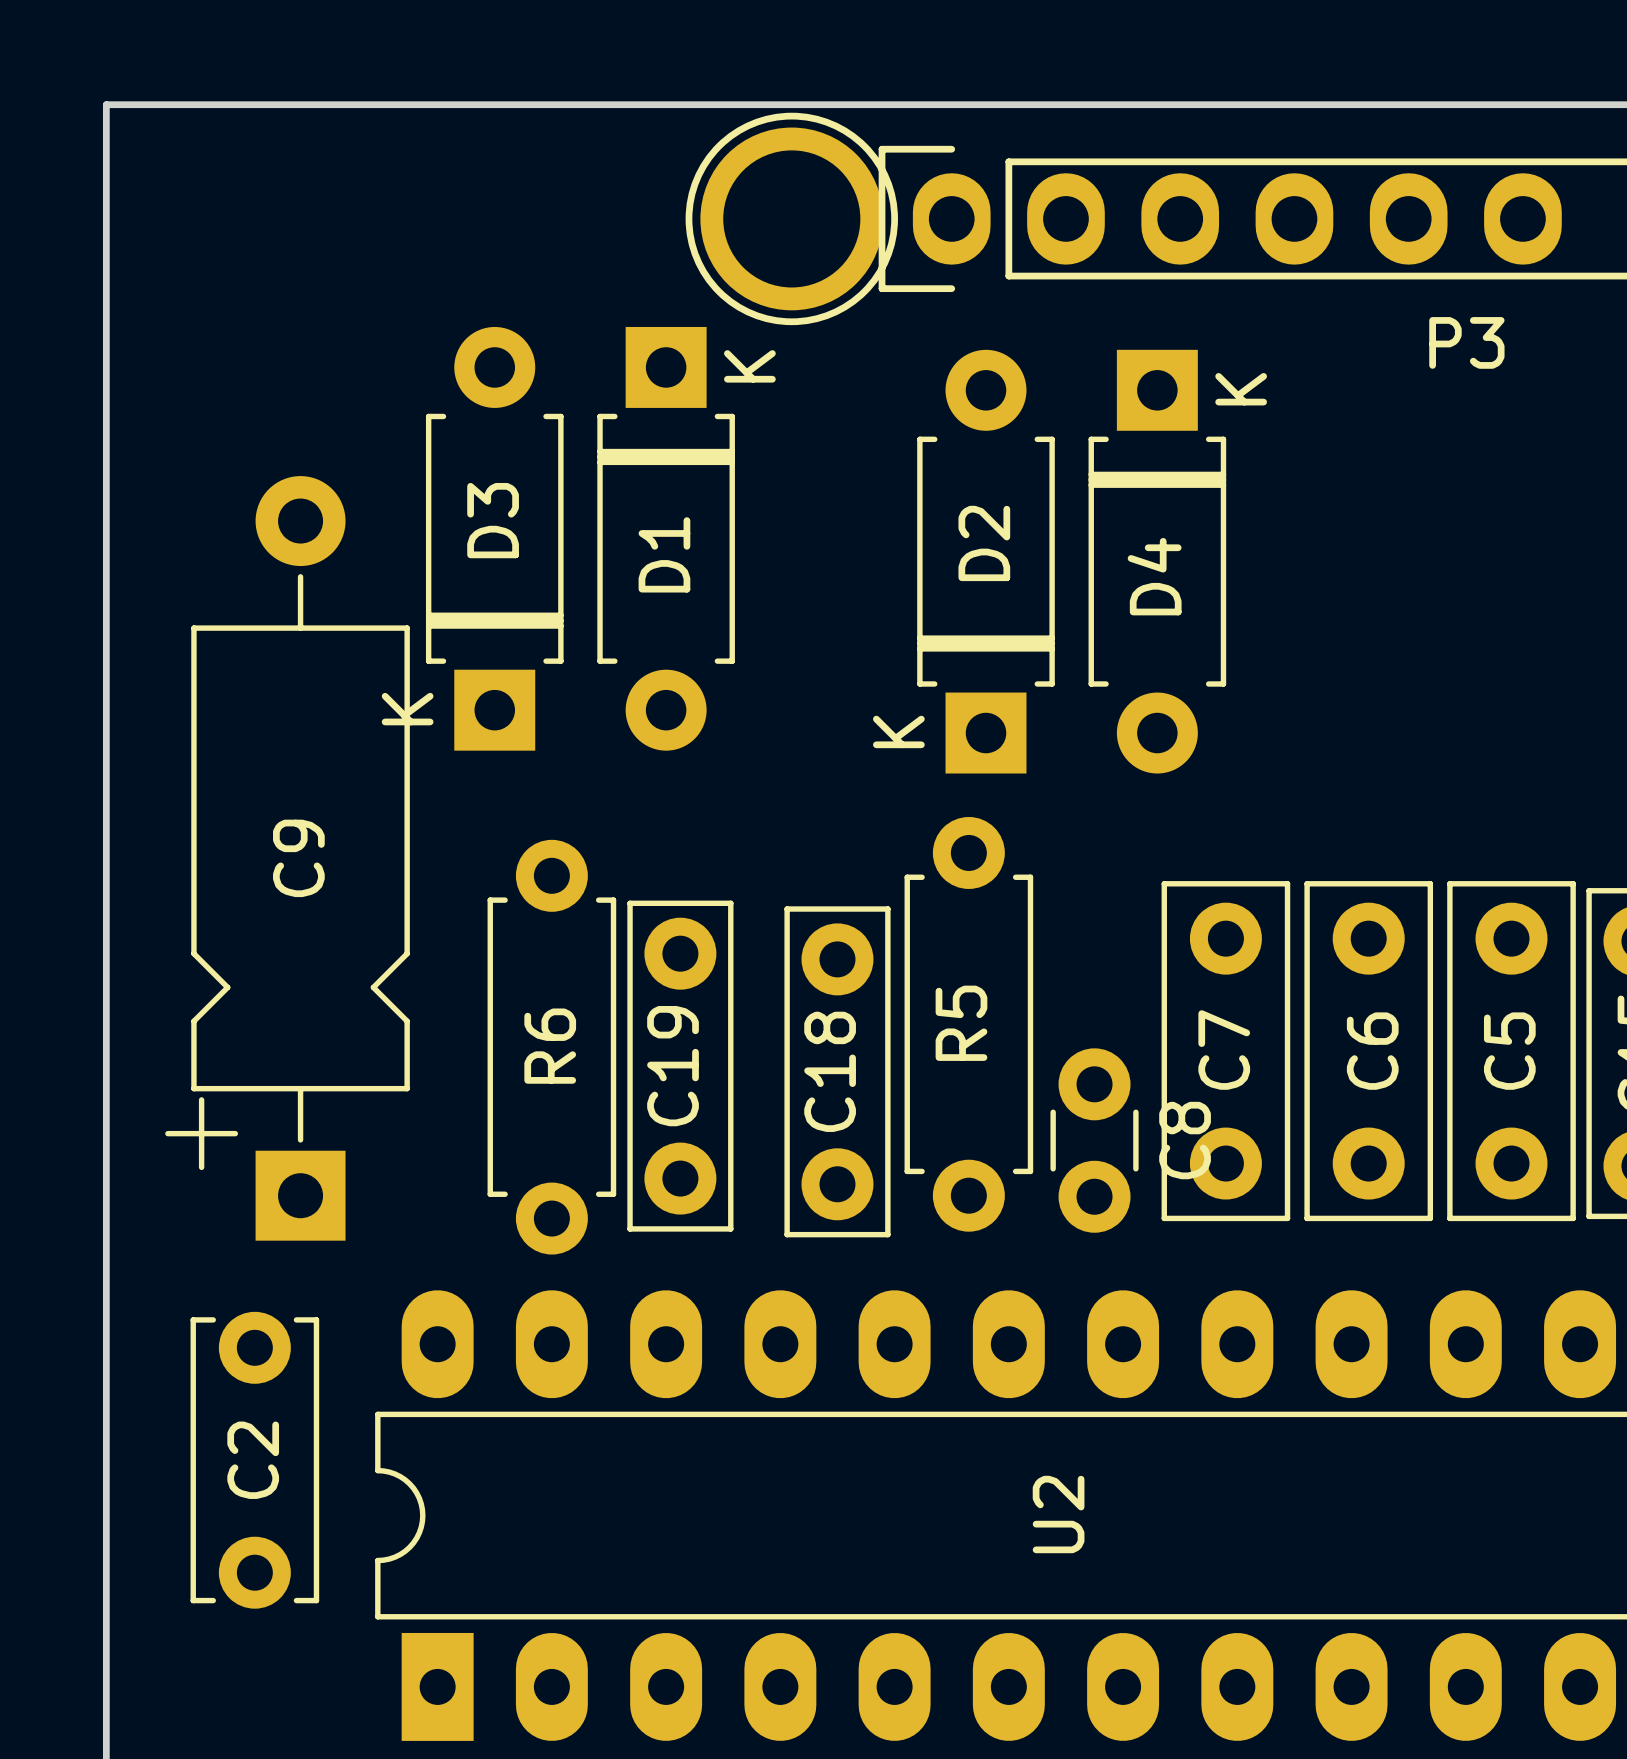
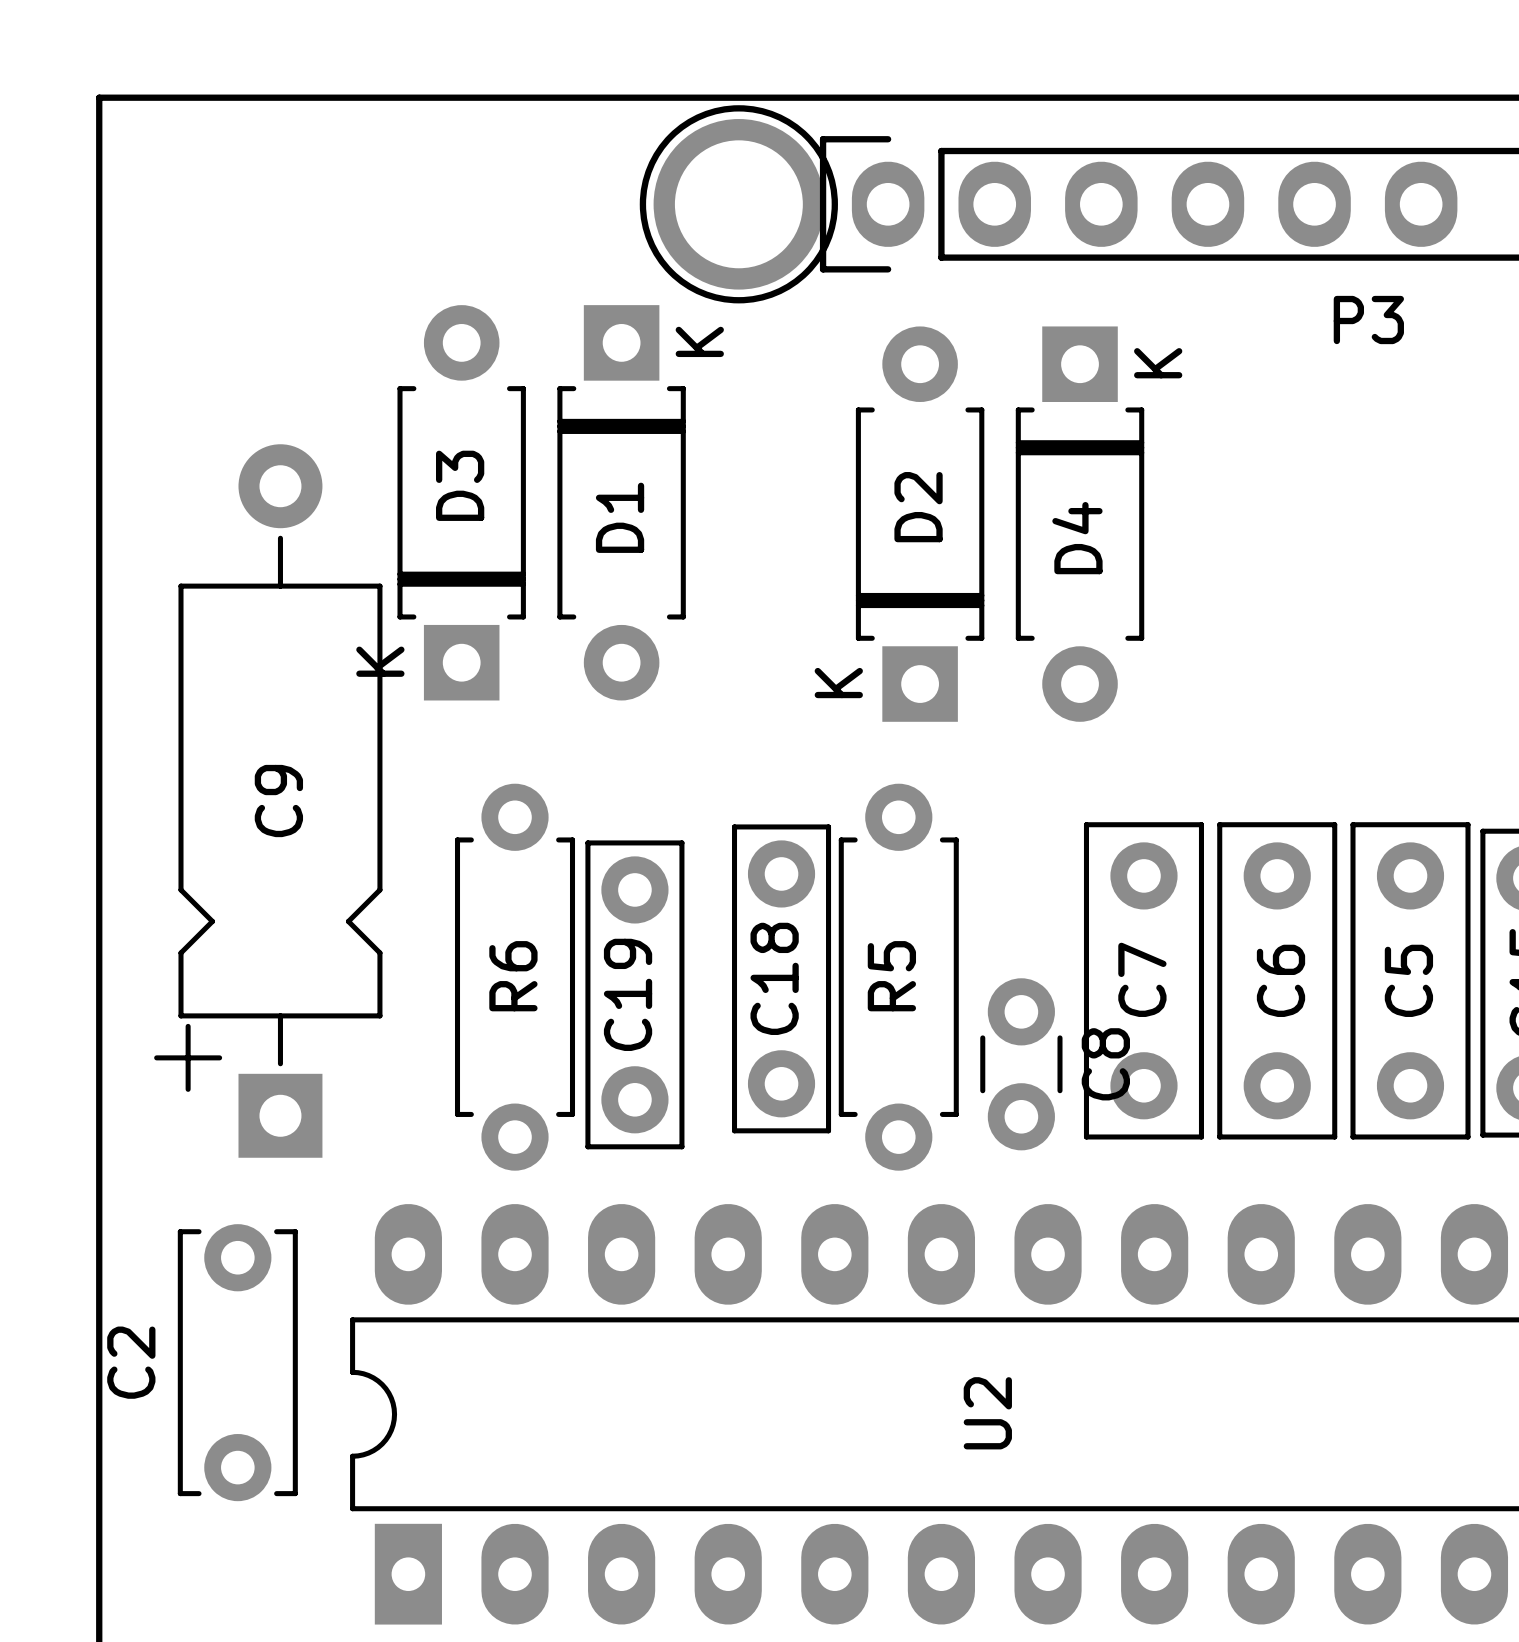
R5 position: (968, 1024) -> (898, 977)
C18 position: (837, 1071) -> (781, 978)
C2 name position: C2 (253, 1460) -> C2 (131, 1362)

